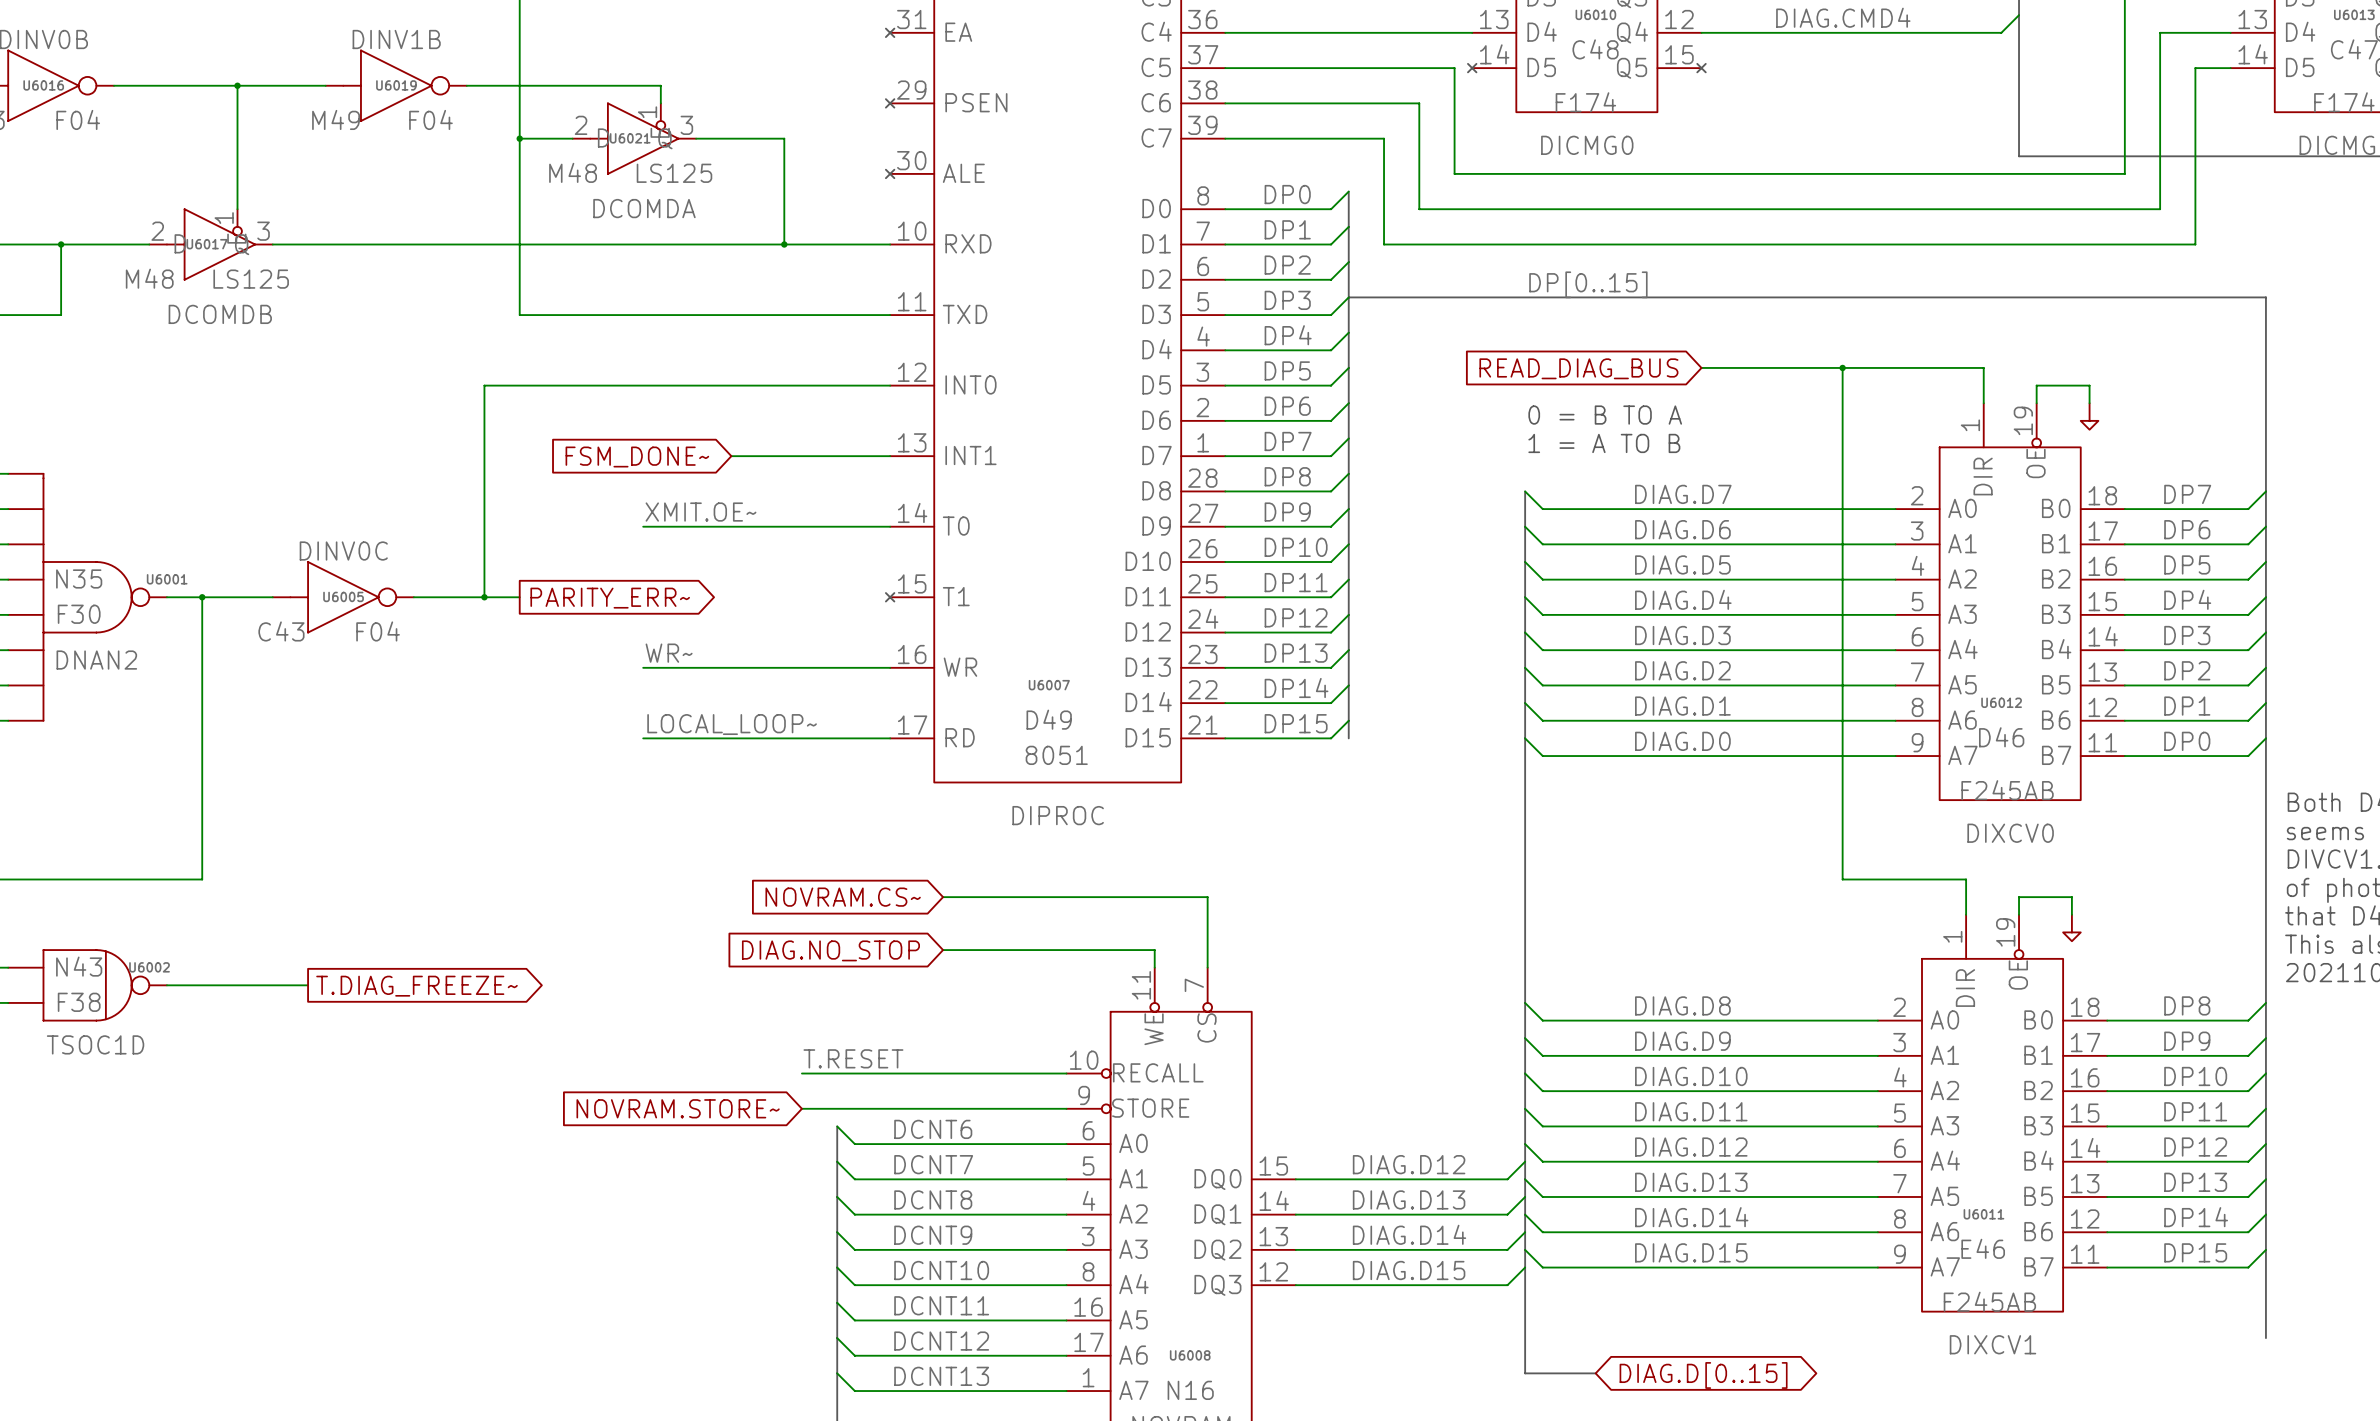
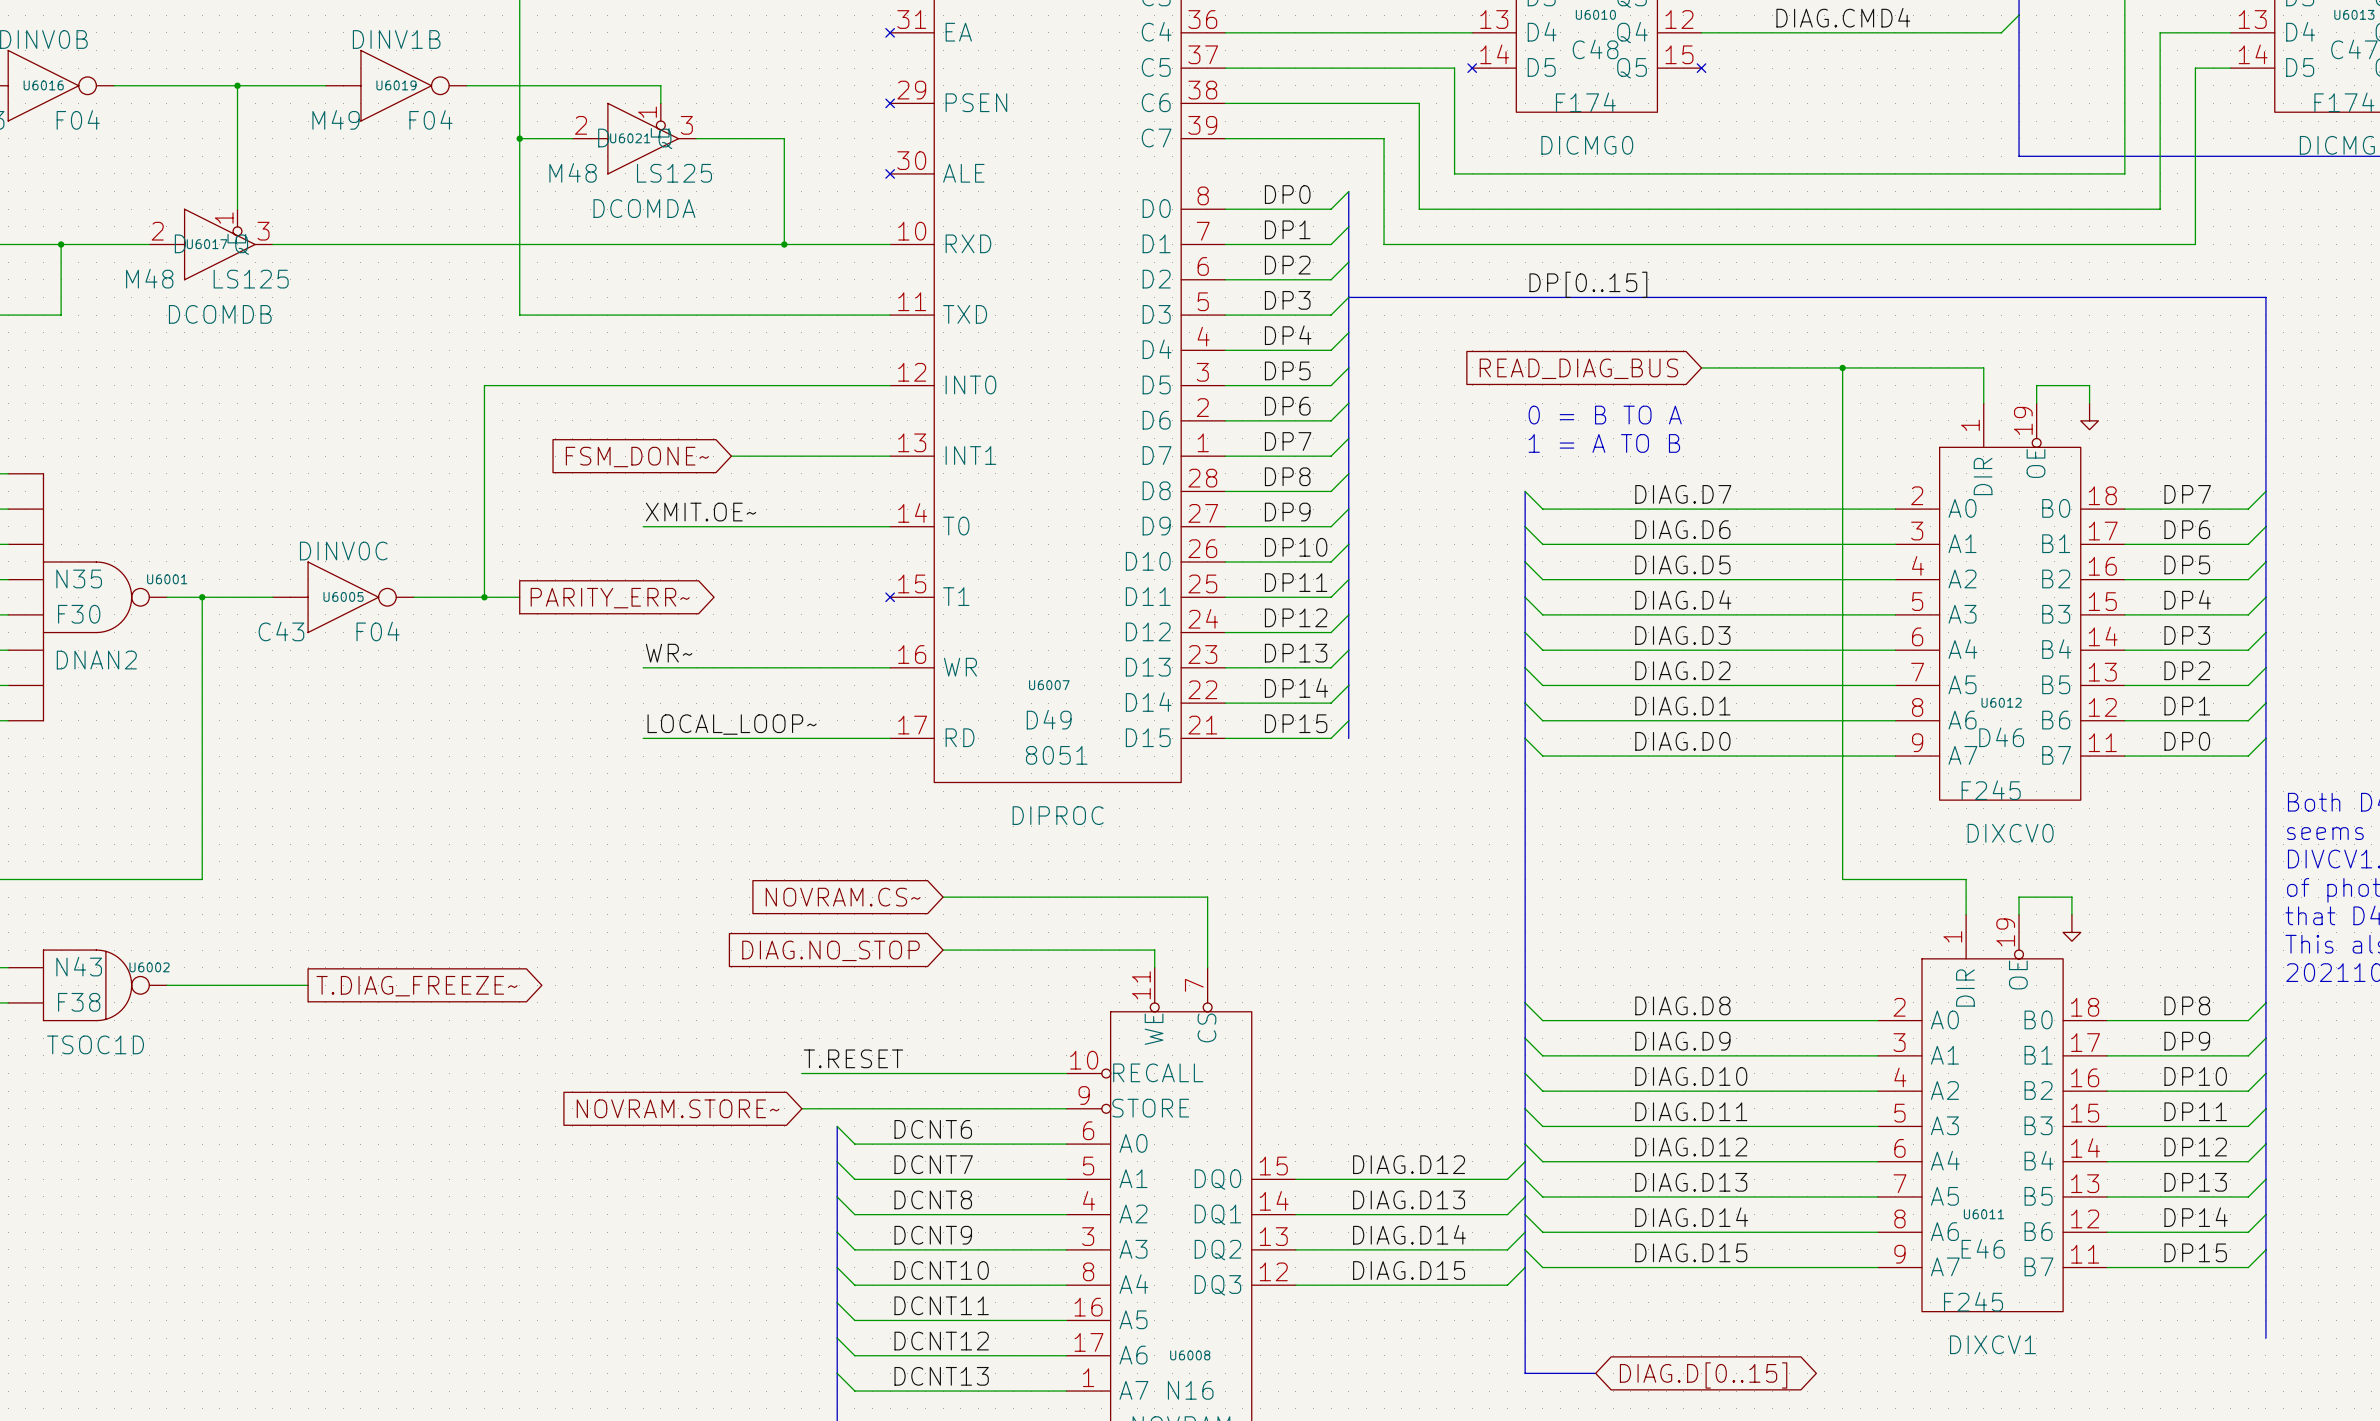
U6012 value: F245AB (2007, 790) -> F245 (1991, 790)
U6011 value: F245AB (1989, 1301) -> F245 (1973, 1301)

